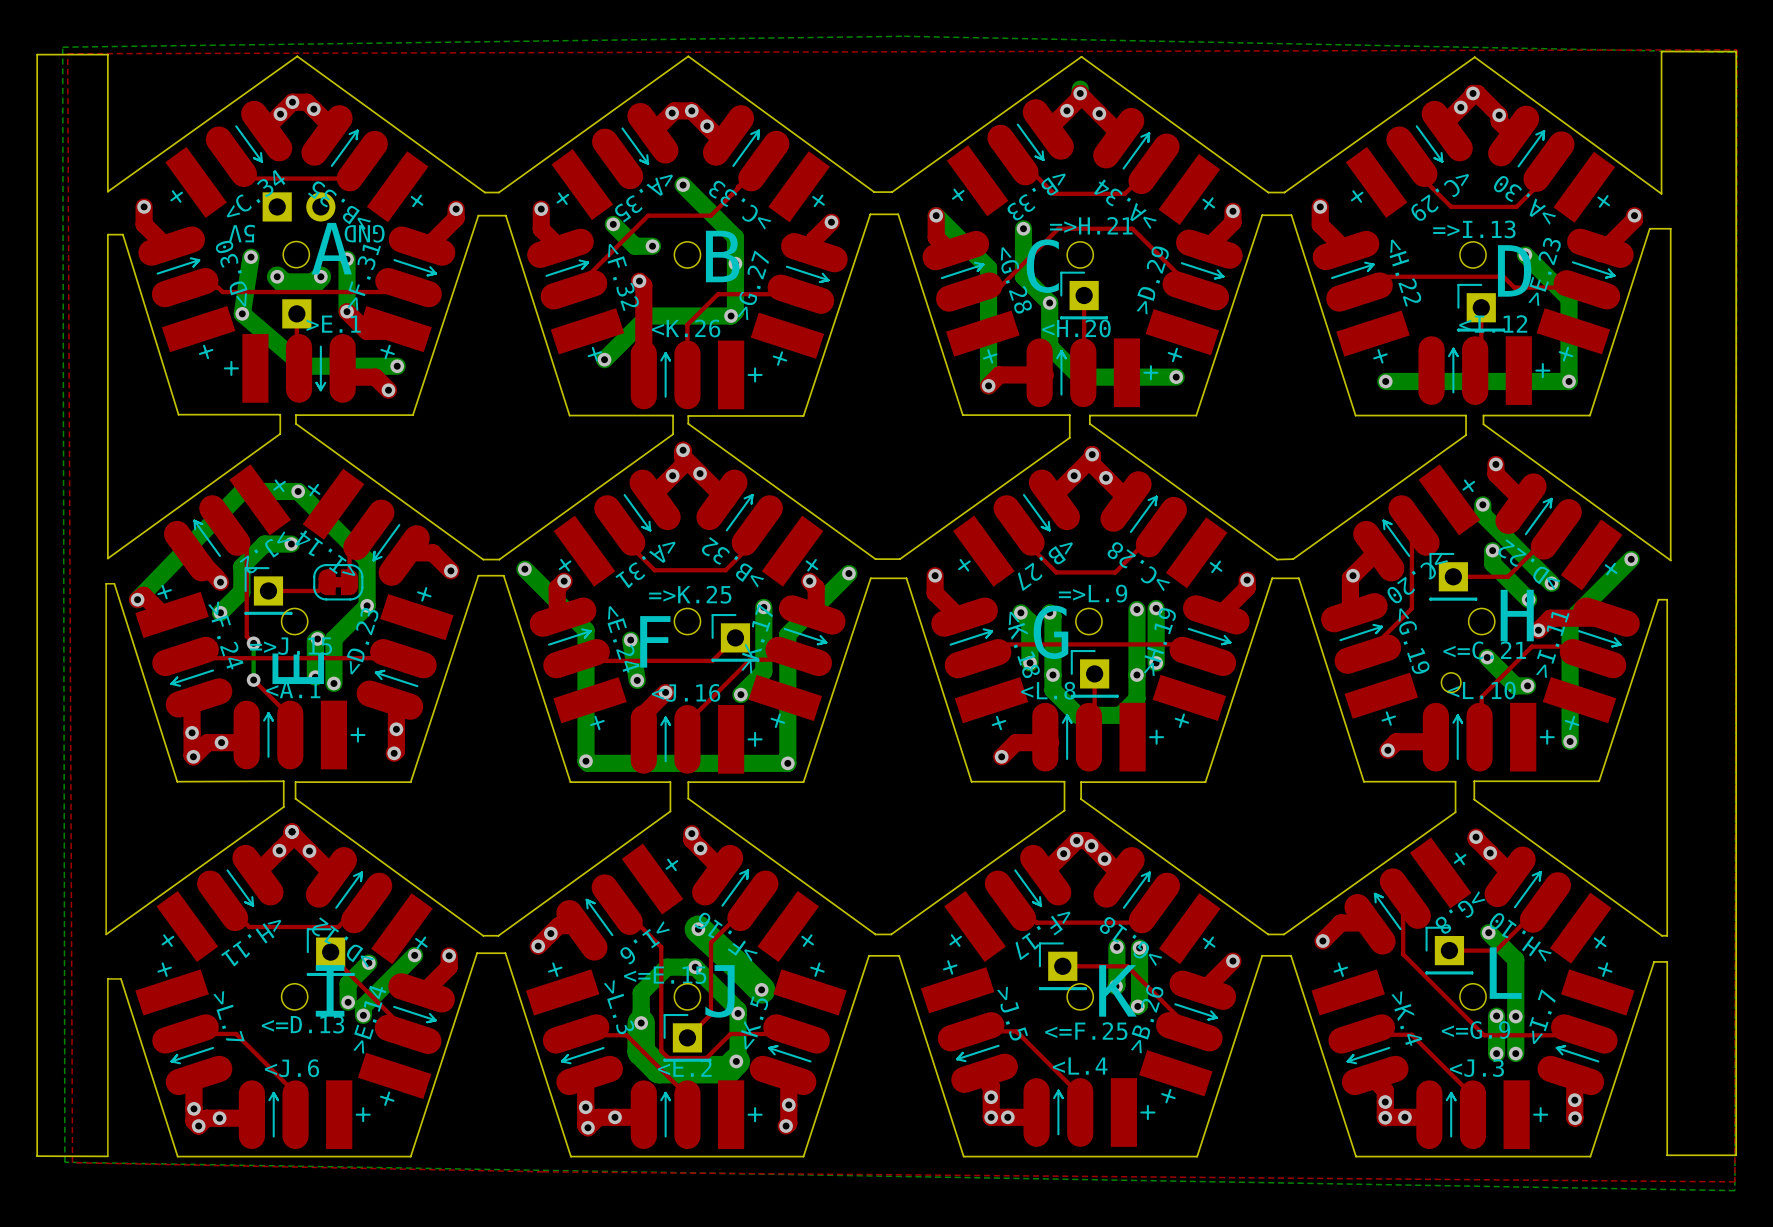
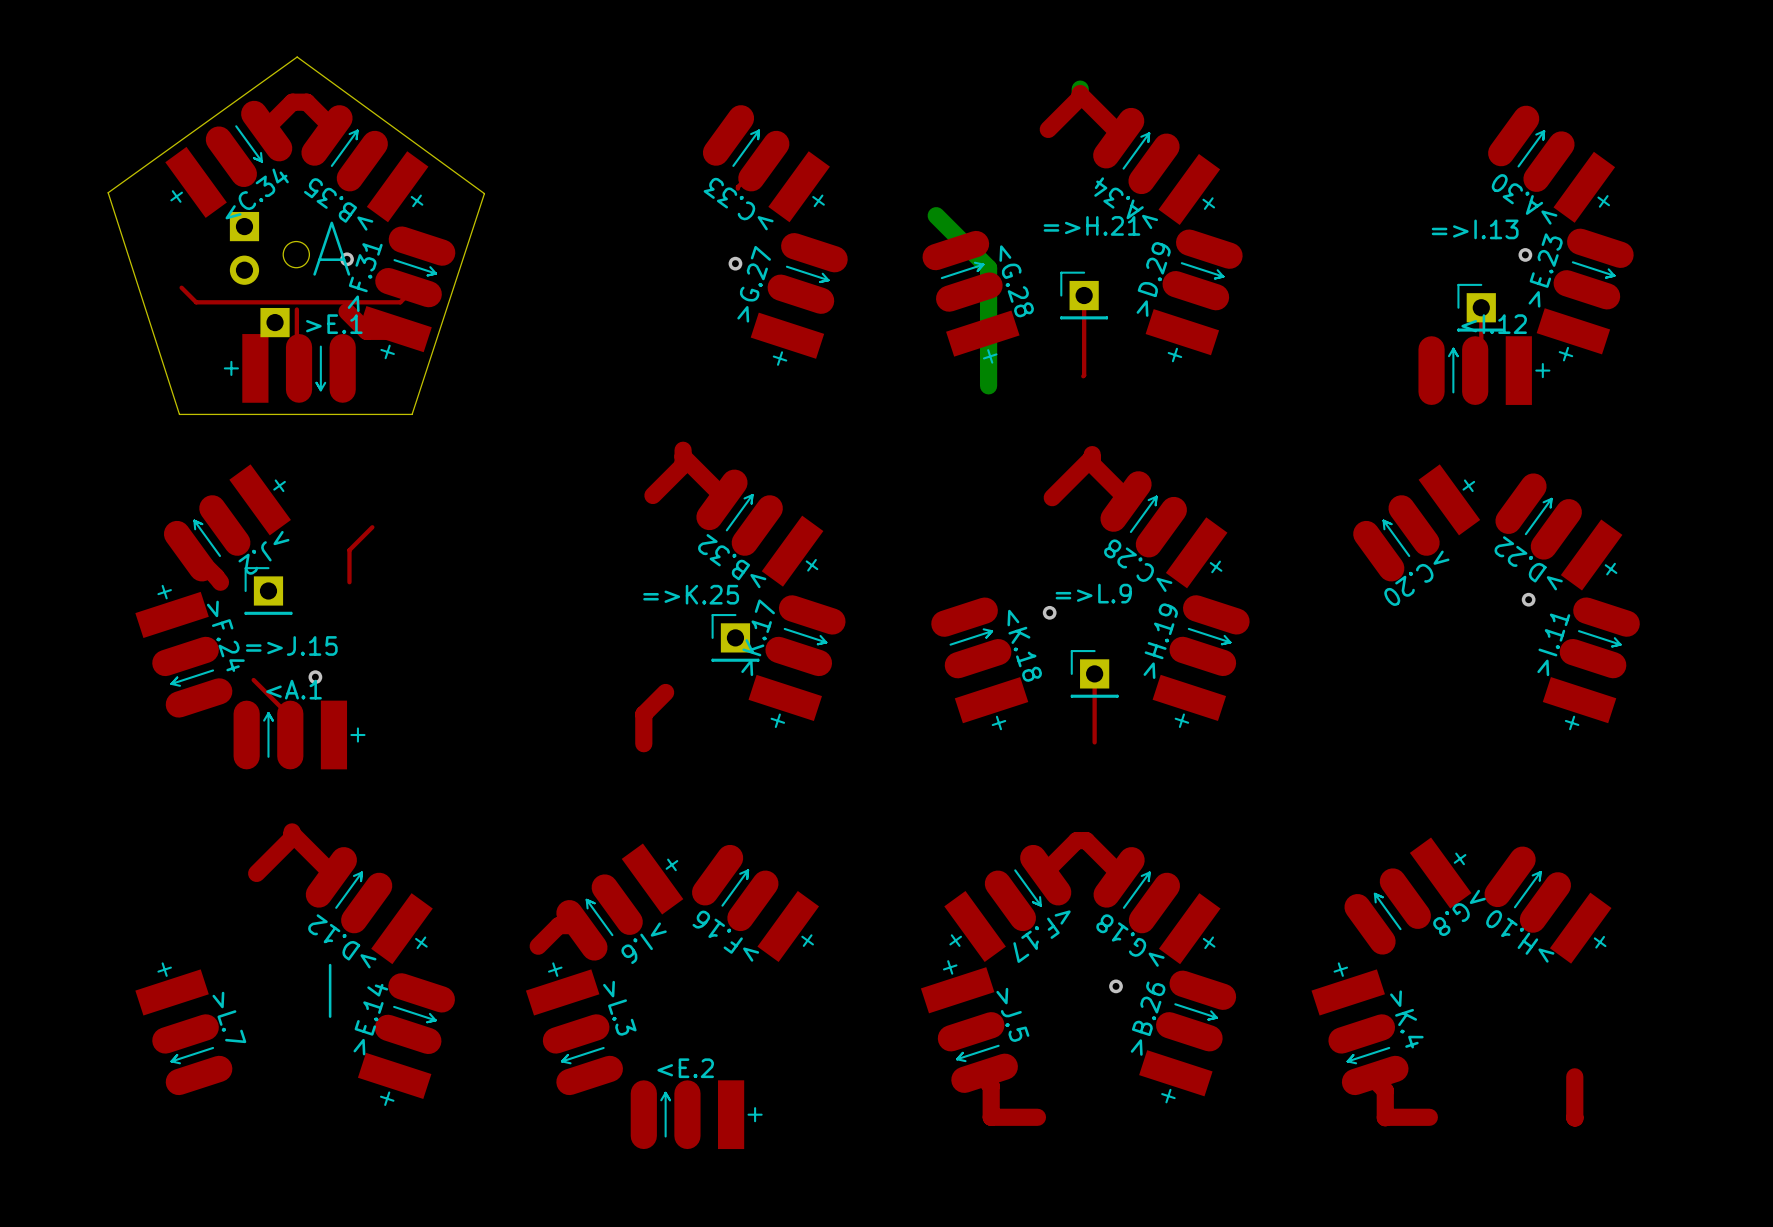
bottom zone outline: (904, 36) (62, 47) (64, 1162) (1734, 1190) (1737, 52) (904, 36) -> none
top zone outline: (1737, 49) (1734, 1181) (542, 1171) (72, 1162) (67, 53) (1737, 49) -> none
board edge: (1661, 51) (1736, 51) (1736, 1155) (1667, 1155) (1667, 961) (1654, 961) (1590, 1156) (1356, 1156) (1291, 955) (1262, 955) (1197, 1156) (963, 1156) (899, 955) (869, 955) (803, 1156) (570, 1156) (505, 953) (477, 953) (410, 1156) (177, 1156) (120, 978) (107, 978) (107, 1156) (37, 1156) (37, 54) (107, 54) (107, 191) (297, 56) (484, 192) (498, 192) (688, 56) (874, 192) (892, 192) (1081, 56) (1268, 192) (1284, 192) (1474, 57) (1661, 193) (1661, 51) -> none
board edge: none -> (297, 57) (484, 193) (412, 414) (179, 414) (108, 192) (297, 57)
via: (1080, 93) -> none
via: (1473, 93) -> none
via: (292, 102) -> none
via: (1460, 107) -> none
via: (313, 109) -> none
via: (691, 110) -> none
via: (1066, 110) -> none
via: (672, 113) -> none
via: (1099, 113) -> none
via: (280, 114) -> none
via: (1499, 115) -> none
top track: (1443, 125) (1473, 93) (1477, 93) (1499, 115) (1499, 121) (1513, 135) -> none
via: (707, 126) -> none
top track: (652, 133) (674, 110) (691, 110) (722, 141) -> none
top track: (1407, 150) (1407, 163) (1451, 206) (1516, 206) (1558, 164) -> none
top track: (229, 154) (251, 178) (344, 178) (368, 154) -> none
top track: (1012, 155) (1015, 155) (1054, 193) (1124, 193) (1156, 161) -> none
<B.33: (1010, 157) -> none
<C.29: (1409, 159) -> none
<A.35: (615, 161) -> none
top track: (759, 167) (710, 215) (648, 215) (573, 289) -> none
bottom track: (683, 185) (735, 237) (735, 311) (731, 316) (648, 316) (604, 359) -> none
via: (683, 185) -> none
top track: (144, 206) (144, 224) (165, 246) -> none
via: (144, 206) -> none
part rotation: 0° (299, 206) -> 90° clockwise (244, 248)
part position: (299, 206) -> (244, 248)
top track: (1320, 206) (1320, 224) (1346, 250) -> none
via: (1320, 206) -> none
top track: (456, 209) (456, 218) (425, 248) -> none
via: (456, 209) -> none
top track: (541, 209) (541, 229) (560, 248) -> none
via: (541, 209) -> none
top track: (1232, 211) (1232, 222) (1207, 248) -> none
via: (1232, 211) -> none
board edge: (870, 214) (898, 214) (962, 415) (1069, 415) (1069, 437) (899, 559) (875, 559) (688, 423) (688, 415) (803, 415) (870, 214) -> none
board edge: (478, 215) (505, 215) (569, 415) (673, 415) (673, 434) (499, 559) (483, 559) (295, 423) (295, 415) (412, 415) (478, 215) -> none
top track: (936, 215) (936, 237) (953, 254) -> none
via: (936, 215) -> none
board edge: (1262, 215) (1196, 415) (1089, 415) (1089, 423) (1277, 559) (1293, 559) (1466, 435) (1466, 415) (1355, 415) (1291, 215) (1262, 215) -> none
top track: (1634, 215) (1634, 219) (1600, 253) -> none
via: (1634, 215) -> none
top track: (831, 222) (814, 239) (814, 257) -> none
via: (831, 222) -> none
bottom track: (613, 224) (635, 246) (652, 246) -> none
via: (613, 224) -> none
bottom track: (1023, 228) (1023, 276) (1049, 302) (1049, 346) (1080, 377) (1176, 377) -> none
via: (1023, 228) -> none
board edge: (1649, 228) (1670, 228) (1670, 560) (1483, 424) (1483, 415) (1589, 415) (1649, 228) -> none
text: 5V (241, 233) -> none
text: GND (364, 233) -> none
board edge: (107, 234) (107, 558) (280, 433) (280, 414) (178, 414) (122, 234) (107, 234) -> none
round board edge: [673, 241, 701, 269] -> none
round board edge: [1066, 241, 1094, 269] -> none
round board edge: [1459, 241, 1487, 269] -> none
via: (652, 246) -> none
bottom track: (1525, 254) (1569, 298) (1569, 381) (1385, 381) -> none
text: B (722, 256) -> none
bottom track: (251, 257) (242, 313) (303, 366) (397, 366) -> none
via: (251, 257) -> none
bottom track: (347, 259) (347, 311) -> none
text: C (1042, 266) -> none
text: D (1514, 270) -> none
bottom track: (277, 276) (284, 283) (313, 283) (320, 276) -> none
via: (277, 276) -> none
via: (320, 276) -> none
top track: (639, 281) (643, 285) (643, 374) -> none
via: (639, 281) -> none
top track: none -> (181, 287) (196, 302) (400, 302) (406, 296)
top track: (185, 287) (218, 287) (222, 292) (404, 292) (408, 287) -> none
top track: (1193, 289) (1132, 228) (1058, 228) (990, 296) (967, 296) -> none
top track: (1586, 289) (1584, 287) (1514, 287) (1503, 276) (1374, 276) (1359, 292) -> none
<D.30: (186, 292) -> none
top track: (800, 294) (717, 294) (687, 324) (687, 374) -> none
<F.32: (575, 295) -> none
<H.22: (1361, 297) -> none
via: (1049, 302) -> none
via: (347, 311) -> none
via: (242, 313) -> none
part position: (296, 313) -> (275, 322)
via: (731, 316) -> none
via: (604, 359) -> none
via: (397, 366) -> none
<H.20: (1092, 372) -> none
<K.26: (696, 374) -> none
top track: (1045, 374) (999, 374) (988, 385) -> none
top track: (340, 377) (375, 377) (388, 390) -> none
via: (1176, 377) -> none
via: (1385, 381) -> none
via: (1569, 381) -> none
via: (988, 385) -> none
via: (388, 390) -> none
via: (683, 450) -> none
via: (1092, 454) -> none
top track: (1495, 464) (1495, 474) (1522, 500) -> none
via: (1495, 464) -> none
via: (700, 473) -> none
via: (672, 475) -> none
via: (1074, 475) -> none
via: (1106, 477) -> none
via: (298, 491) -> none
bottom track: (1482, 504) (1482, 514) (1551, 583) -> none
via: (1482, 504) -> none
top track: (617, 521) (617, 533) (654, 570) (725, 570) (758, 537) (758, 522) -> none
top track: (1411, 521) (1411, 608) (1363, 656) -> none
top track: (223, 522) (246, 546) (246, 636) (253, 643) -> none
top track: (1016, 523) (1016, 533) (1056, 572) (1115, 572) (1162, 524) -> none
top track: (1558, 526) (1507, 576) (1453, 576) -> none
<I.14: (366, 527) -> none
<A.31: (617, 528) -> none
<B.27: (1016, 528) -> none
bottom track: (291, 544) (264, 544) (241, 566) (241, 592) (220, 612) -> none
via: (291, 544) -> none
top track: (1376, 548) (1376, 552) (1350, 578) (1350, 614) -> none
bottom track: (1492, 550) (1492, 563) (1528, 599) -> none
via: (1492, 550) -> none
top track: (407, 552) (432, 552) (450, 570) -> none
bottom track: (1631, 559) (1570, 620) (1570, 741) -> none
via: (1631, 559) -> none
bottom track: (524, 569) (585, 630) (585, 761) (588, 763) (787, 763) (787, 634) (848, 573) -> none
via: (524, 569) -> none
via: (450, 570) -> none
via: (848, 573) -> none
board edge: (478, 575) (503, 575) (570, 782) (670, 782) (670, 811) (498, 935) (483, 935) (295, 798) (295, 782) (410, 782) (478, 575) -> none
top track: (935, 575) (935, 593) (960, 618) -> none
via: (935, 575) -> none
via: (1352, 575) -> none
<=C.21: (1453, 576) -> none
board edge: (870, 578) (906, 578) (971, 781) (1064, 781) (1064, 810) (891, 934) (875, 934) (688, 798) (688, 782) (803, 782) (870, 578) -> none
board edge: (1272, 578) (1298, 578) (1363, 781) (1455, 781) (1455, 812) (1284, 934) (1268, 934) (1081, 799) (1081, 782) (1205, 782) (1272, 578) -> none
top track: (1247, 580) (1247, 588) (1219, 616) -> none
via: (1247, 580) -> none
top track: (564, 581) (557, 588) (557, 619) -> none
via: (564, 581) -> none
top track: (809, 581) (816, 587) (816, 618) -> none
via: (809, 581) -> none
via: (220, 582) -> none
top track: (327, 582) (318, 590) (268, 590) -> none
part: (338, 582) -> none
board edge: (106, 583) (114, 583) (177, 781) (283, 781) (283, 807) (106, 934) (106, 583) -> none
via: (1551, 583) -> none
top track: (137, 599) (143, 595) (165, 616) -> none
bottom track: (137, 599) (242, 491) (298, 491) (367, 560) (367, 605) (333, 638) (333, 683) -> none
via: (137, 599) -> none
board edge: (1658, 599) (1667, 599) (1667, 935) (1661, 935) (1474, 799) (1474, 781) (1599, 781) (1658, 599) -> none
via: (367, 605) -> none
bottom track: (763, 607) (763, 671) (740, 694) -> none
via: (763, 607) -> none
round board edge: [281, 608, 309, 636] -> none
round board edge: [673, 608, 701, 636] -> none
round board edge: [1075, 608, 1103, 636] -> none
bottom track: (1156, 608) (1156, 662) -> none
via: (1156, 608) -> none
round board edge: [1468, 608, 1496, 636] -> none
bottom track: (1136, 609) (1136, 698) (1120, 715) (1078, 715) (1052, 690) (1052, 616) (1049, 612) -> none
via: (1136, 609) -> none
via: (220, 612) -> none
bottom track: (1020, 612) (1029, 621) (1030, 662) -> none
via: (1020, 612) -> none
text: H (1517, 615) -> none
top track: (1610, 618) (1550, 618) (1538, 630) -> none
via: (1538, 630) -> none
text: G (1050, 632) -> none
top track: (735, 637) (712, 660) (570, 660) -> none
bottom track: (317, 638) (315, 641) (315, 677) -> none
via: (317, 638) -> none
bottom track: (630, 640) (637, 680) -> none
via: (630, 640) -> none
text: F (655, 641) -> none
bottom track: (253, 643) (253, 680) -> none
via: (253, 643) -> none
<D.23: (405, 653) -> none
top track: (1205, 657) (1192, 644) (988, 644) (973, 659) -> none
bottom track: (1487, 657) (1515, 685) (1527, 685) -> none
via: (1487, 657) -> none
top track: (178, 658) (409, 659) -> none
top track: (802, 659) (750, 659) (687, 722) (687, 743) -> none
<G.19: (1369, 659) -> none
top track: (1597, 659) (1584, 646) (1531, 646) (1481, 696) (1481, 741) -> none
via: (1030, 662) -> none
via: (1156, 662) -> none
<E.24: (578, 663) -> none
text: E (298, 668) -> none
round board edge: [1440, 672, 1462, 693] -> none
via: (1052, 674) -> none
via: (1136, 674) -> none
via: (253, 680) -> none
via: (637, 680) -> none
via: (333, 683) -> none
via: (1527, 685) -> none
via: (665, 692) -> none
via: (740, 694) -> none
top track: (192, 699) (193, 756) (207, 742) (251, 742) -> none
top track: (396, 700) (396, 751) (394, 753) -> none
via: (396, 729) -> none
via: (192, 732) -> none
<L.8: (1098, 737) -> none
<L.10: (1488, 737) -> none
<J.16: (696, 739) -> none
top track: (1438, 741) (1396, 741) (1387, 750) -> none
via: (1570, 741) -> none
via: (221, 742) -> none
top track: (1050, 742) (1015, 742) (1001, 756) -> none
via: (1387, 750) -> none
via: (394, 753) -> none
via: (193, 756) -> none
via: (1001, 756) -> none
via: (585, 761) -> none
via: (787, 763) -> none
via: (292, 831) -> none
top track: (691, 833) (691, 839) (724, 872) -> none
via: (691, 833) -> none
top track: (1476, 837) (1511, 874) -> none
via: (1476, 837) -> none
via: (1076, 840) -> none
via: (1091, 845) -> none
via: (700, 848) -> none
via: (279, 850) -> none
via: (309, 851) -> none
via: (1063, 853) -> none
via: (1490, 853) -> none
via: (1104, 858) -> none
top track: (1403, 897) (1403, 954) (1484, 1035) (1588, 1035) -> none
top track: (221, 899) (249, 927) (338, 927) (354, 911) (358, 911) (368, 900) -> none
top track: (614, 899) (661, 947) (661, 1050) (668, 1058) (706, 1058) (730, 1033) (802, 1033) -> none
top track: (1546, 899) (1496, 950) (1449, 950) -> none
top track: (752, 900) (711, 942) (711, 1014) (687, 1037) -> none
top track: (1156, 900) (1134, 922) (1036, 922) (1012, 898) (1009, 898) (1022, 911) -> none
<H.11: (220, 903) -> none
top track: (1367, 923) (1340, 923) (1322, 940) -> none
bottom track: (698, 929) (761, 989) -> none
via: (698, 929) -> none
bottom track: (1488, 932) (1515, 959) (1515, 1053) -> none
via: (1488, 932) -> none
via: (550, 933) -> none
via: (1322, 940) -> none
via: (538, 946) -> none
bottom track: (1116, 947) (1116, 986) -> none
via: (1116, 947) -> none
bottom track: (1139, 947) (1139, 1004) (1137, 1006) -> none
via: (1139, 947) -> none
<=G.9: (1449, 950) -> none
top track: (330, 952) (330, 955) (409, 1034) -> none
<=D.13: (330, 952) -> none
bottom track: (414, 955) (363, 1006) (363, 1015) -> none
via: (414, 955) -> none
top track: (449, 955) (449, 967) (423, 992) -> none
via: (449, 955) -> none
top track: (1232, 961) (1208, 985) (1208, 992) -> none
via: (1232, 961) -> none
bottom track: (368, 963) (348, 983) (348, 1002) -> none
via: (368, 963) -> none
top track: (1062, 966) (1127, 966) (1195, 1034) -> none
<=F.25: (1062, 966) -> none
bottom track: (666, 967) (641, 992) (641, 1051) (659, 1069) (728, 1069) (738, 1059) (738, 1009) (695, 967) (666, 967) -> none
via: (695, 967) -> none
text: L (1505, 973) -> none
round board edge: [281, 983, 309, 1011] -> none
round board edge: [673, 983, 701, 1011] -> none
round board edge: [1066, 983, 1094, 1011] -> none
round board edge: [1459, 983, 1487, 1011] -> none
via: (761, 989) -> none
text: K (1117, 990) -> none
text: J (720, 991) -> none
via: (348, 1002) -> none
via: (1137, 1006) -> none
via: (738, 1013) -> none
via: (363, 1015) -> none
bottom track: (1496, 1016) (1496, 1053) -> none
via: (1496, 1016) -> none
via: (1515, 1016) -> none
via: (641, 1023) -> none
<K.5: (798, 1028) -> none
<I.7: (1585, 1028) -> none
top track: (964, 1031) (1016, 1031) (1081, 1096) (1081, 1117) -> none
top track: (185, 1033) (236, 1033) (295, 1093) (295, 1114) -> none
top track: (1357, 1034) (1411, 1034) (1473, 1096) (1473, 1117) -> none
top track: (572, 1035) (626, 1035) (687, 1096) (687, 1117) -> none
<=E.15: (687, 1037) -> none
via: (1496, 1053) -> none
via: (1515, 1053) -> none
via: (736, 1061) -> none
top track: (788, 1075) (788, 1123) (786, 1126) -> none
top track: (585, 1076) (585, 1125) (587, 1127) (598, 1117) (643, 1117) -> none
top track: (193, 1079) (193, 1121) (198, 1126) (206, 1118) (251, 1118) -> none
via: (991, 1097) -> none
via: (1574, 1100) -> none
via: (1385, 1102) -> none
via: (788, 1105) -> none
via: (585, 1107) -> none
via: (193, 1108) -> none
<L.4: (1089, 1112) -> none
<J.6: (304, 1114) -> none
<J.3: (1482, 1114) -> none
via: (615, 1117) -> none
via: (991, 1117) -> none
via: (1007, 1117) -> none
via: (1385, 1117) -> none
via: (1404, 1117) -> none
via: (219, 1118) -> none
via: (1575, 1118) -> none
via: (198, 1126) -> none
via: (786, 1126) -> none
via: (587, 1127) -> none

